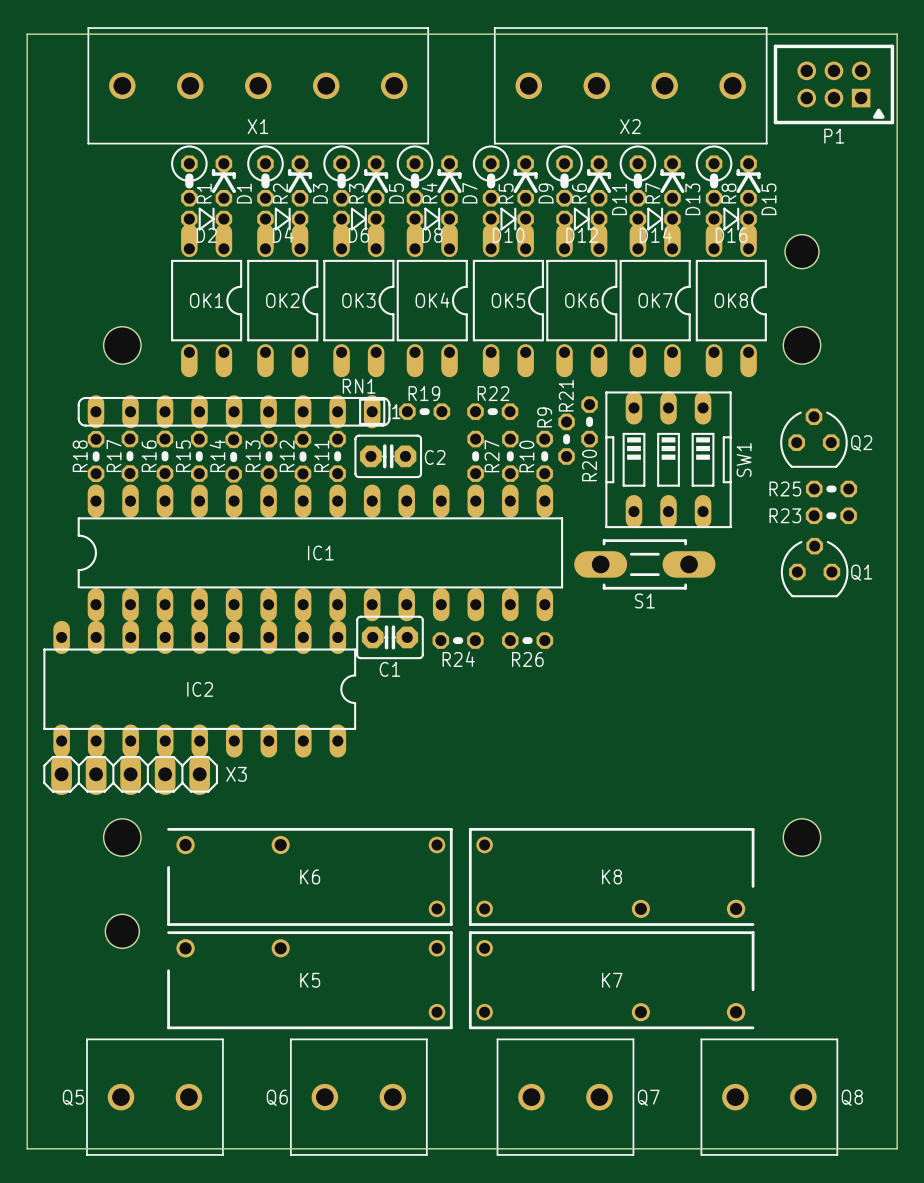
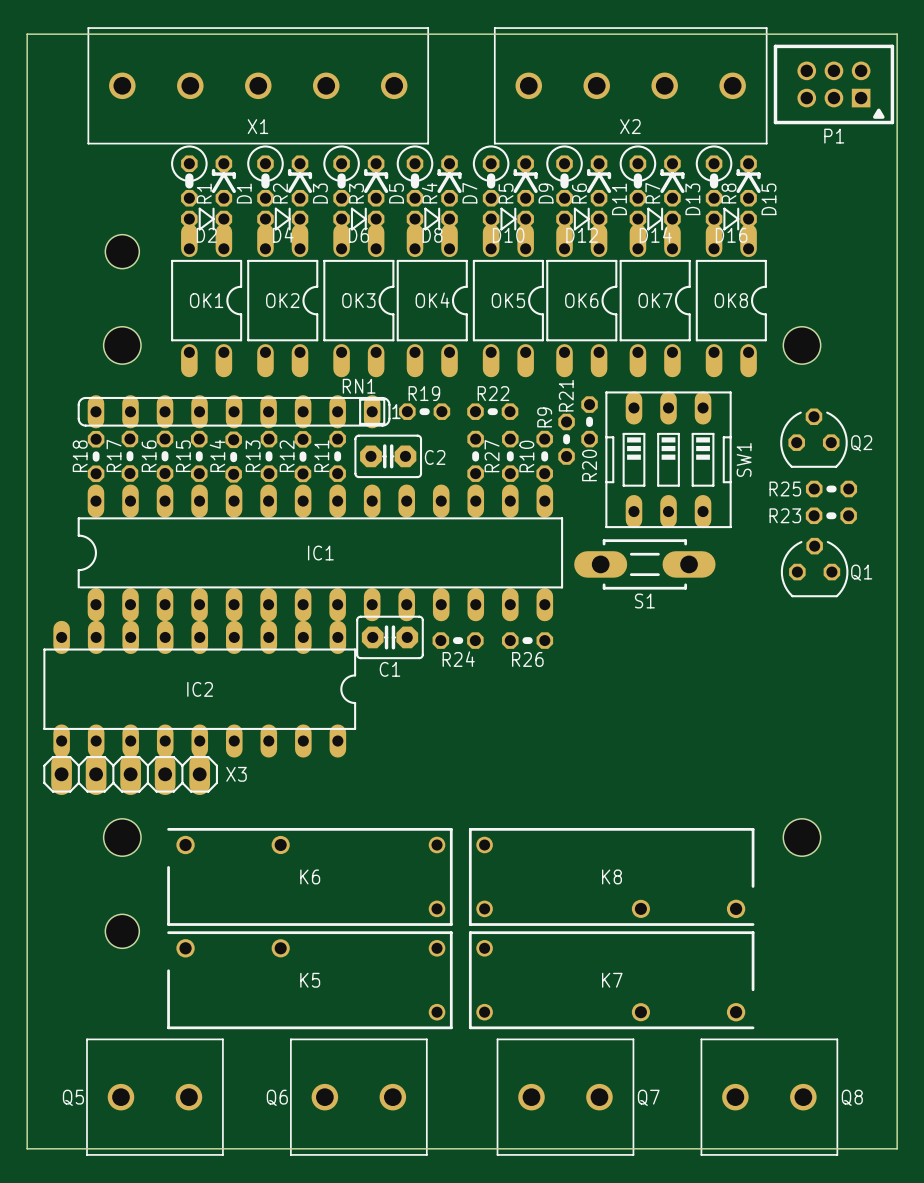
hole: none -> (122, 251)
hole: (802, 251) -> none

